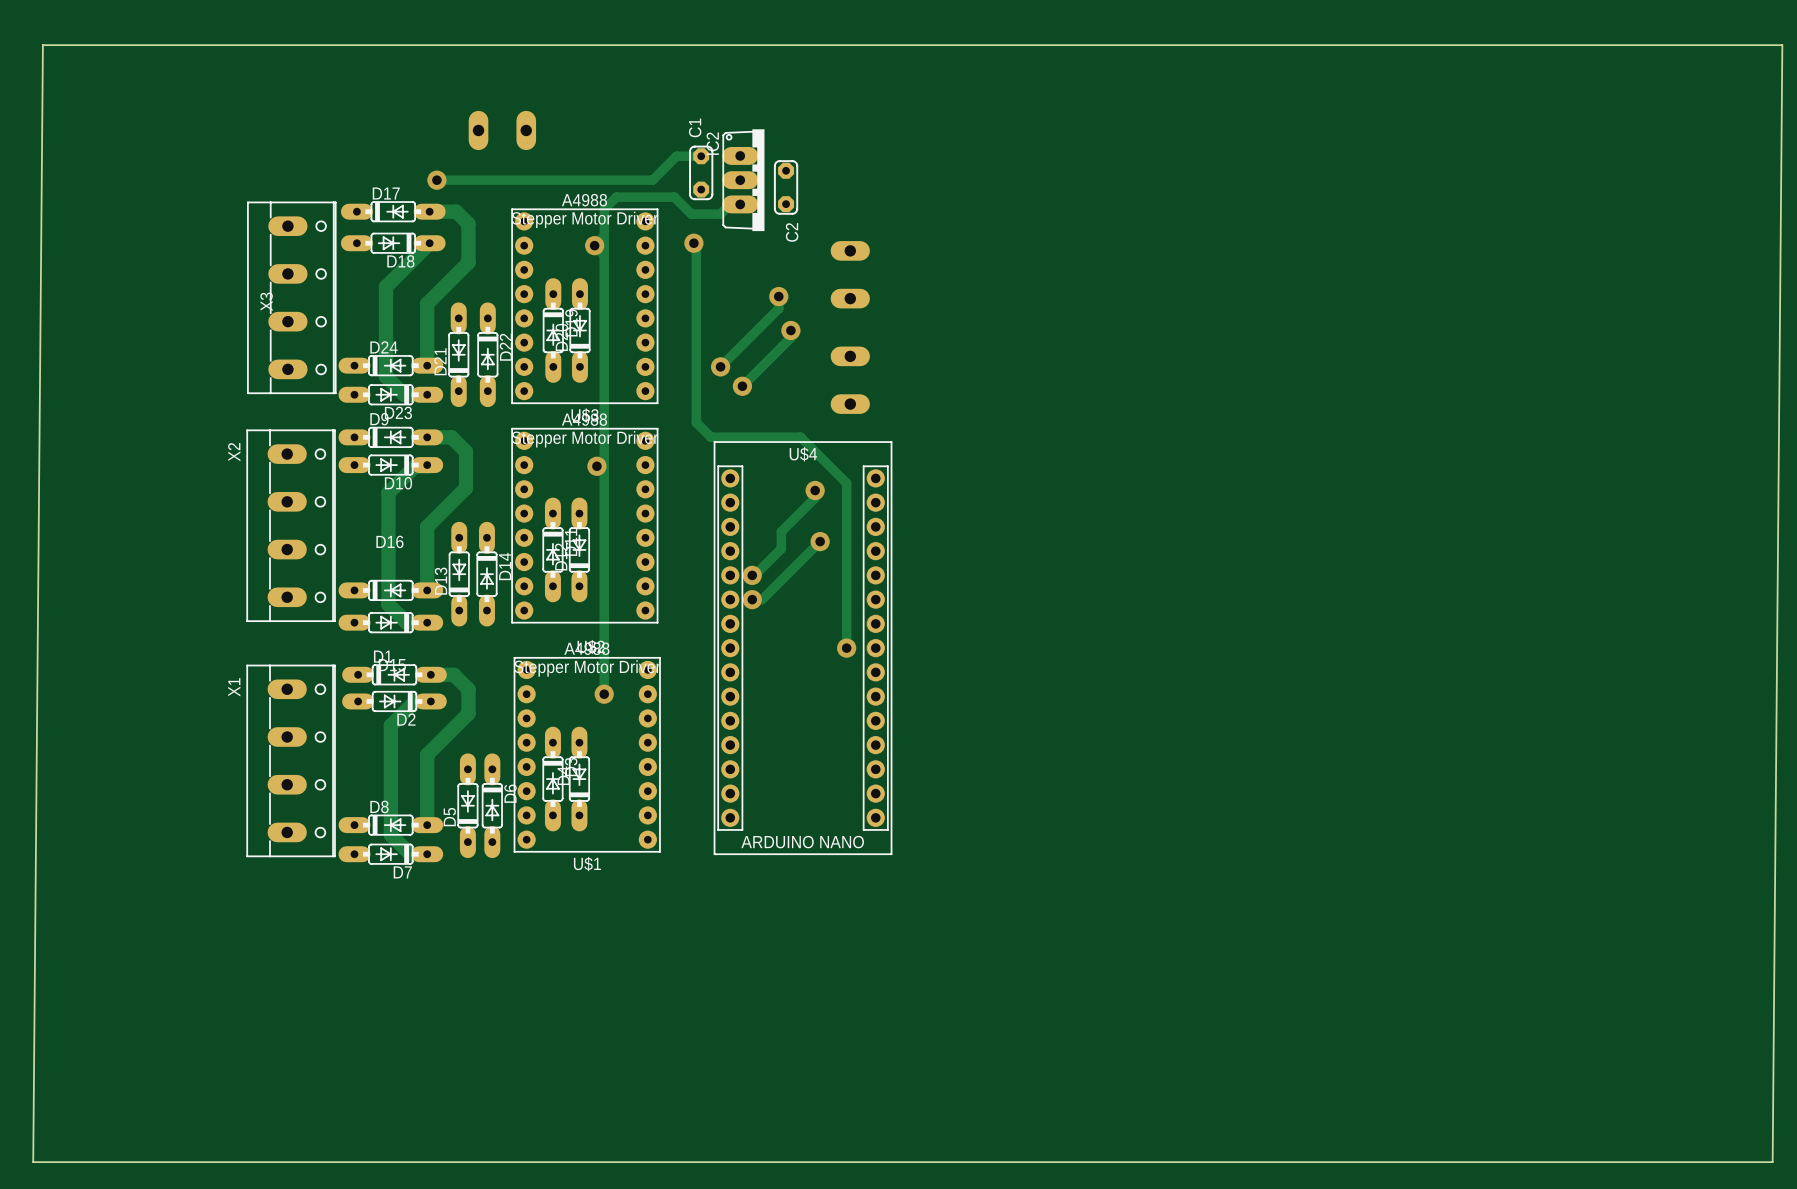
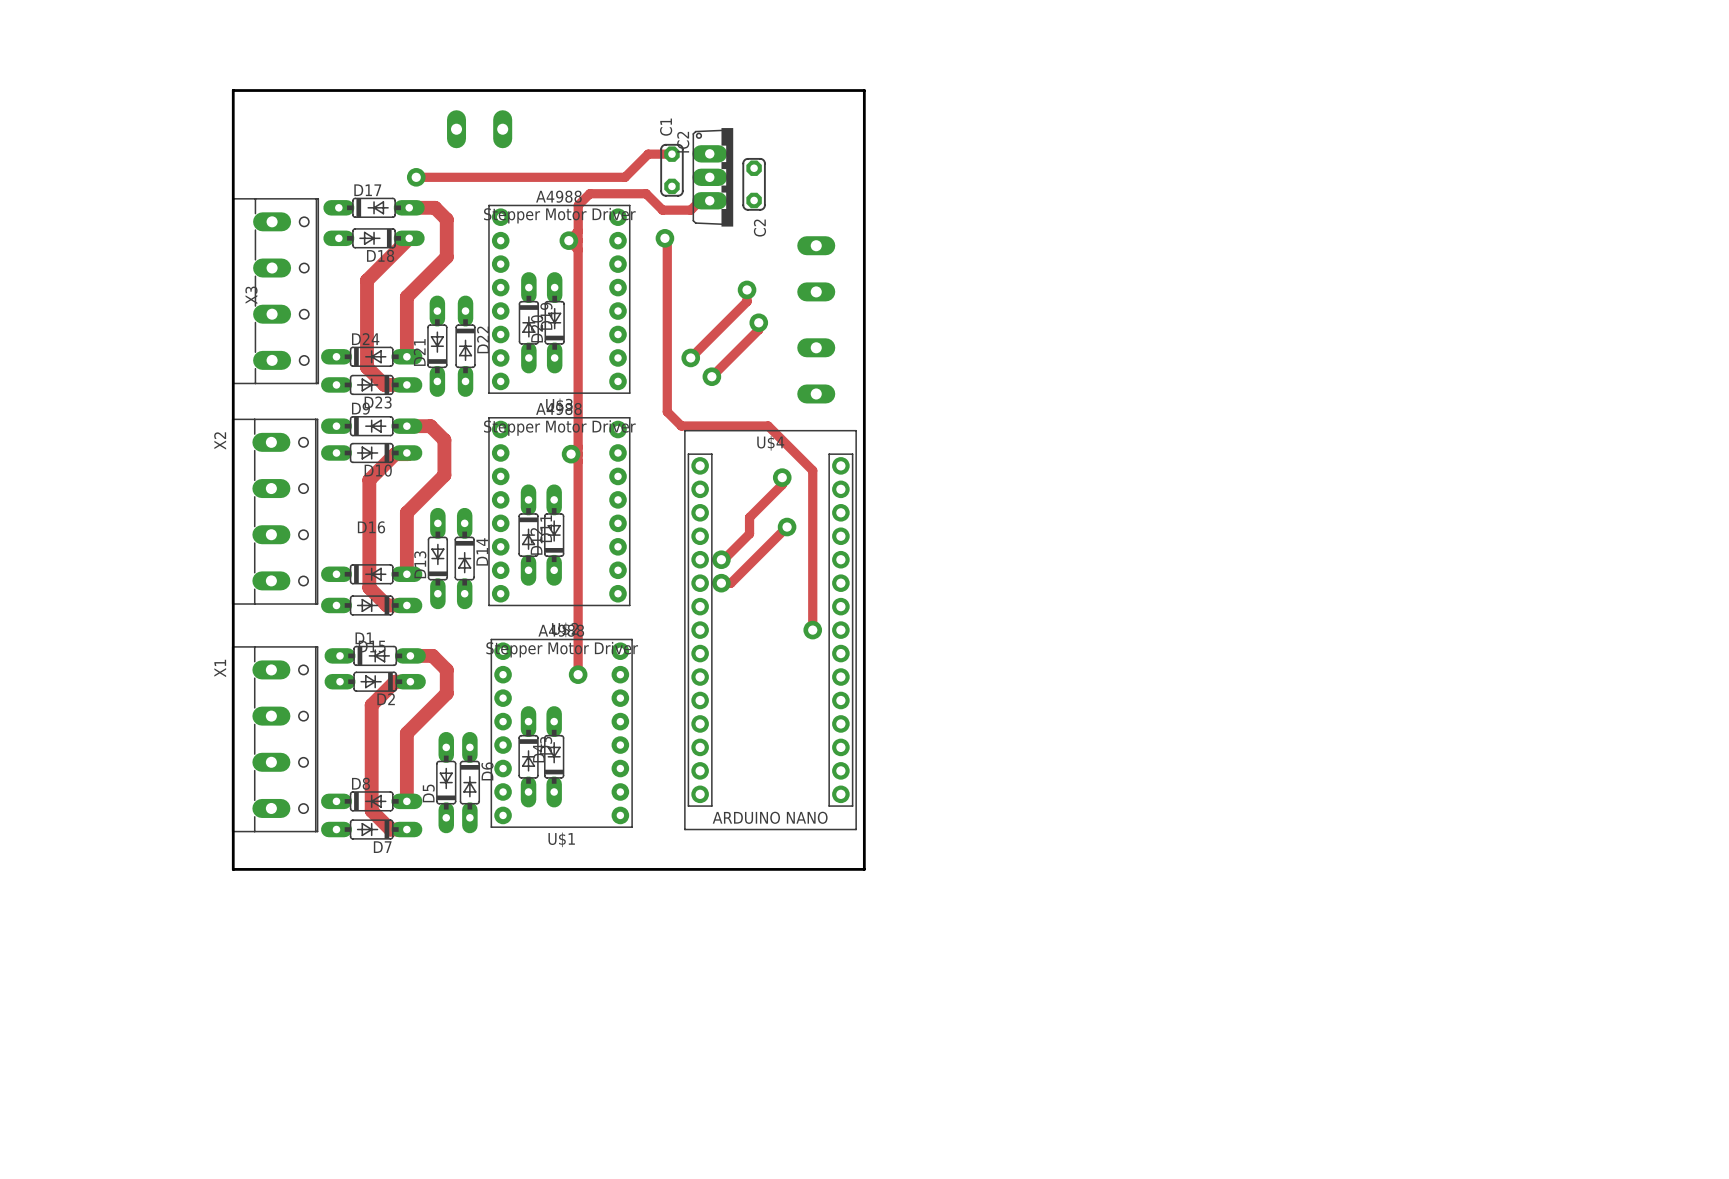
board edge: (42, 45) (1782, 45) (1772, 1162) (33, 1162) (42, 45) -> none
board edge: none -> (233, 90) (233, 869) (864, 869) (864, 90) (233, 90)

